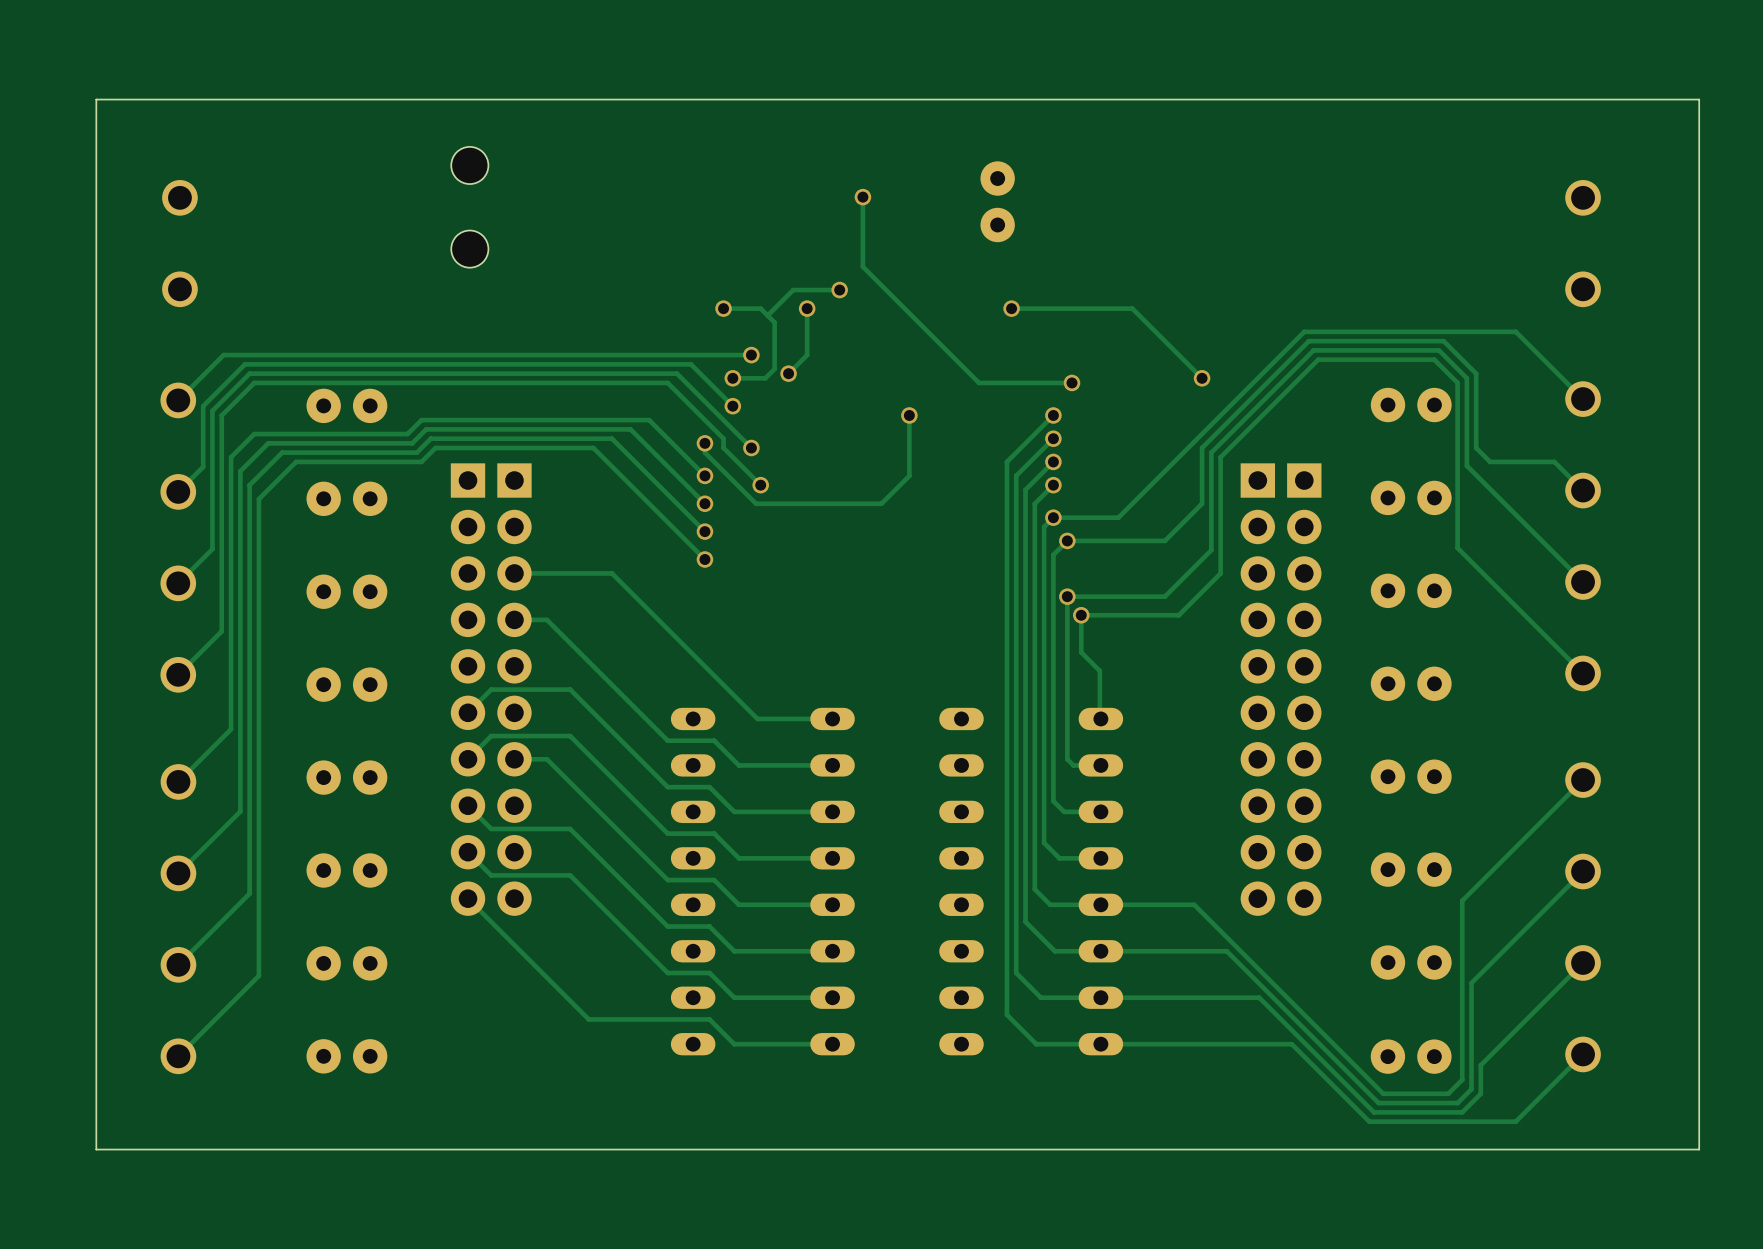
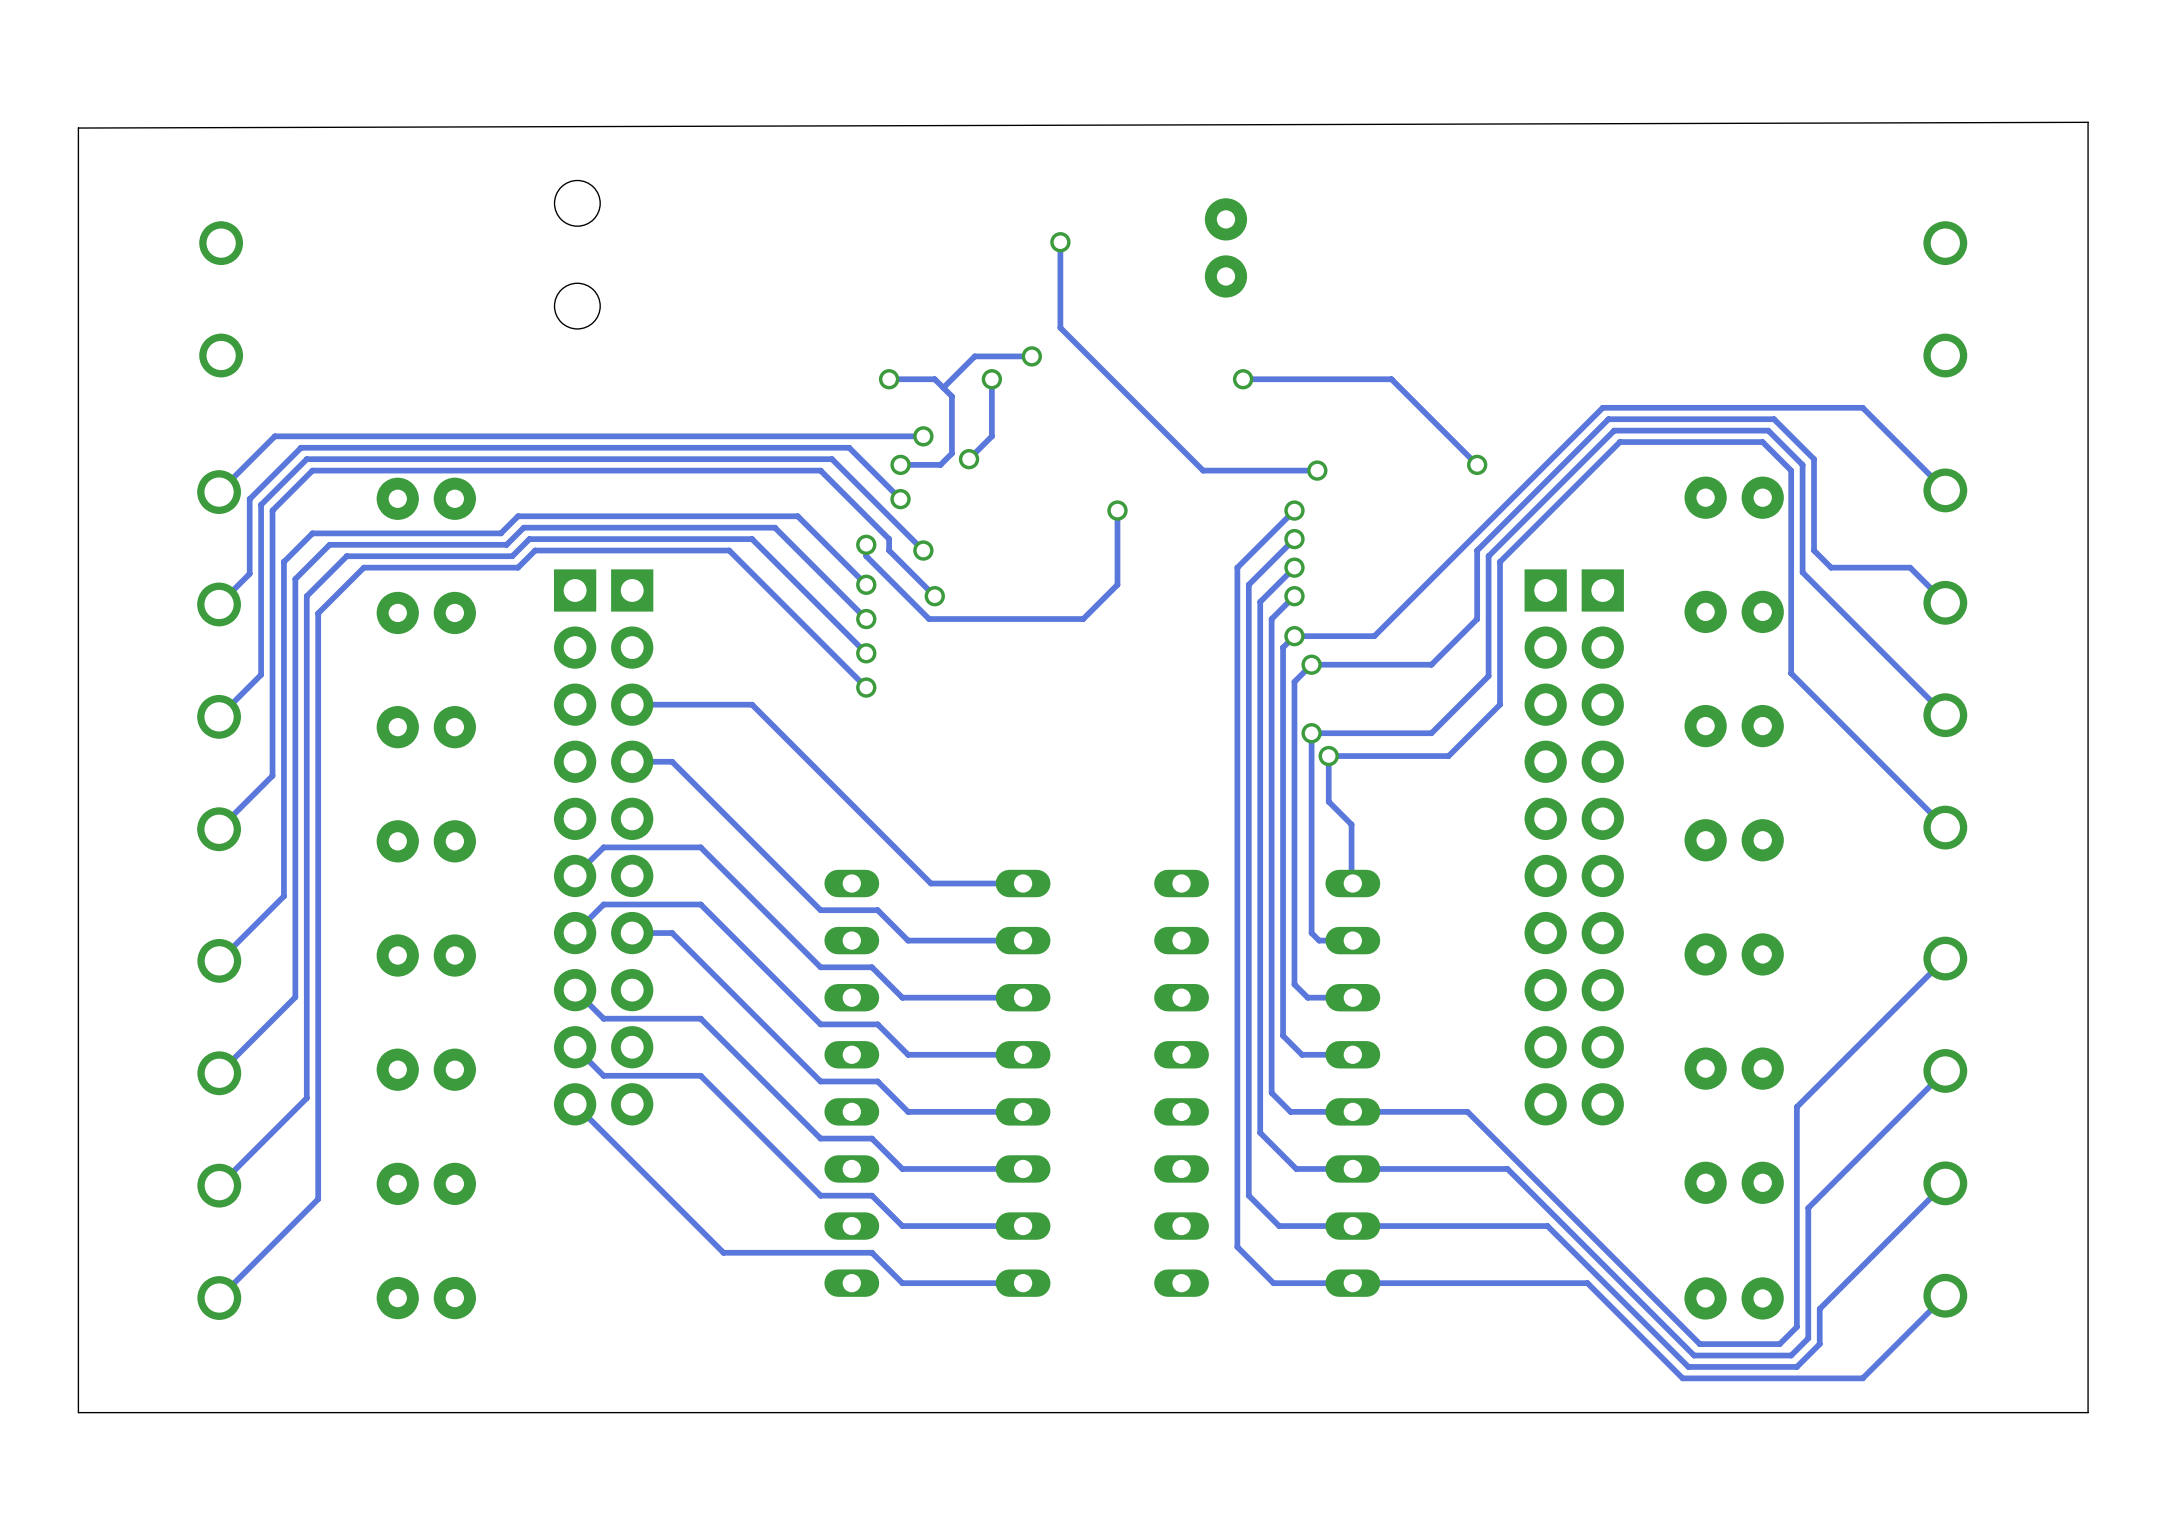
board edge: (1699, 99) (96, 99) (96, 1149) -> (2088, 122) (78, 128) (78, 1412) (118, 1412)

